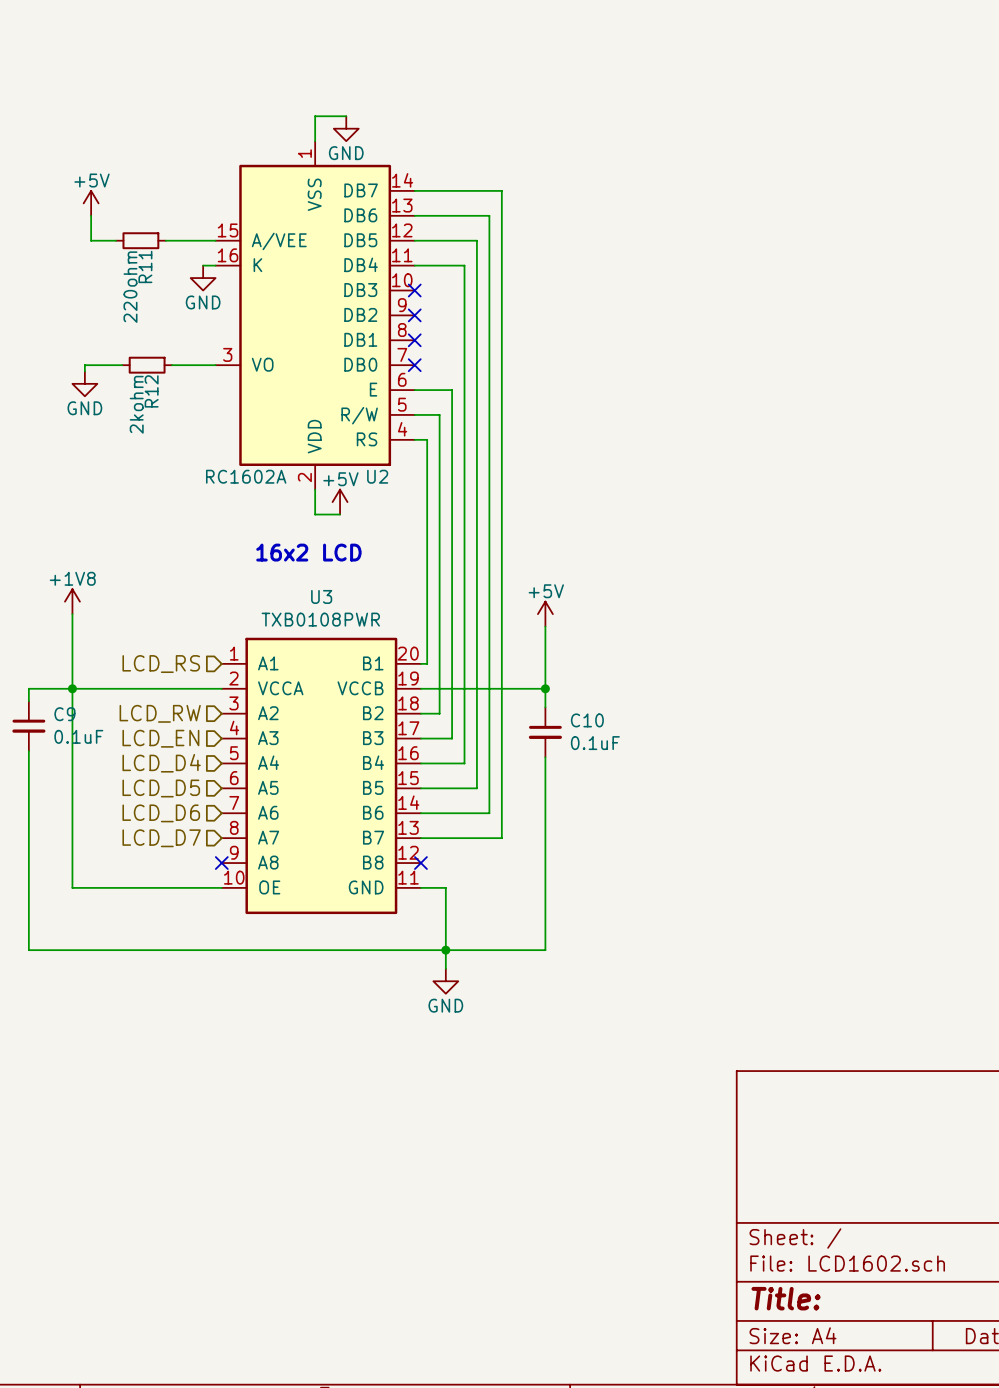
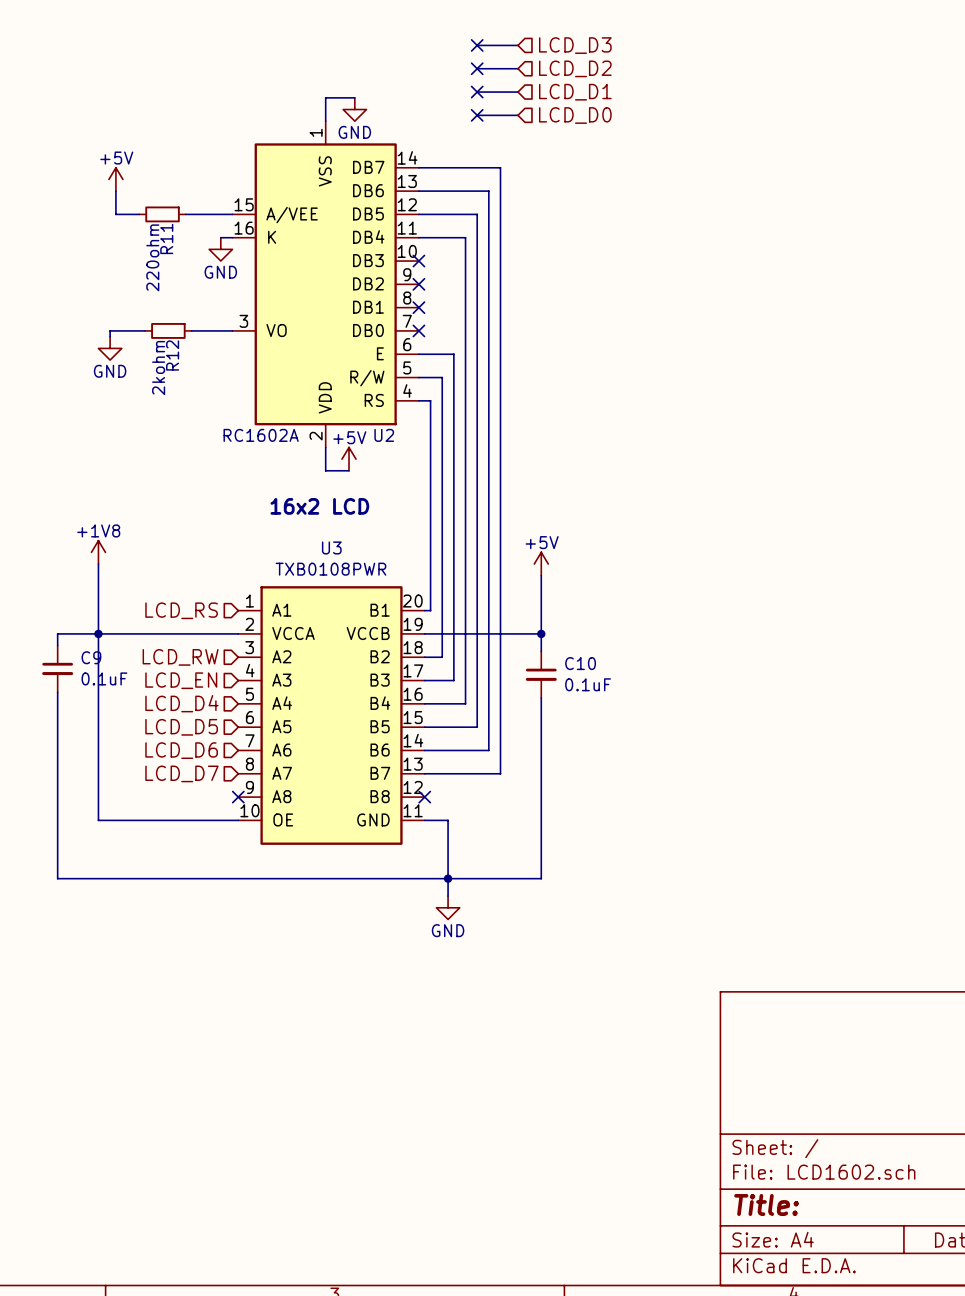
wire: none -> (477, 45) (517, 45)
no-connect mark: none -> (477, 45)
hierarchical label: none -> LCD_D3 (575, 45)
wire: none -> (477, 68) (517, 68)
no-connect mark: none -> (477, 68)
hierarchical label: none -> LCD_D2 (575, 68)
wire: none -> (477, 92) (517, 92)
no-connect mark: none -> (477, 92)
hierarchical label: none -> LCD_D1 (575, 92)
wire: none -> (477, 115) (517, 115)
no-connect mark: none -> (477, 115)
hierarchical label: none -> LCD_D0 (575, 115)

